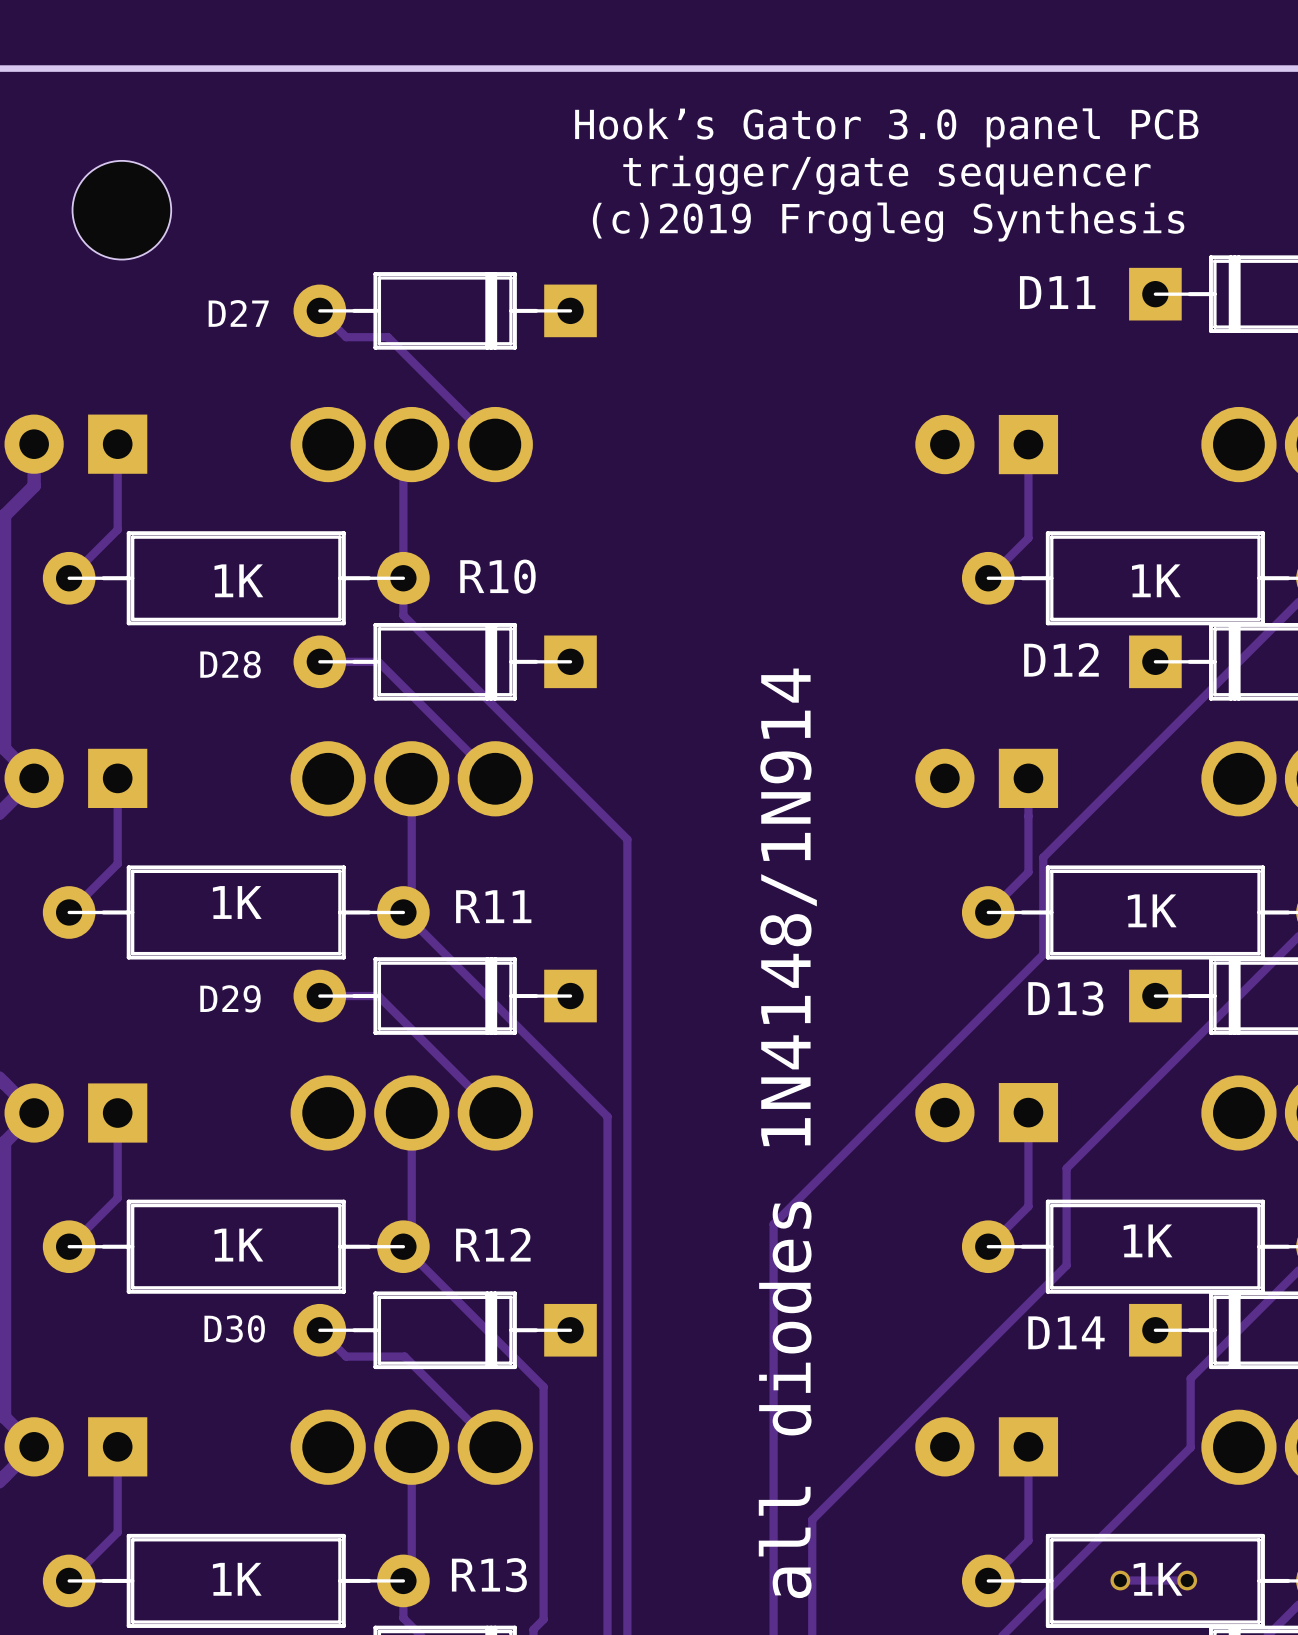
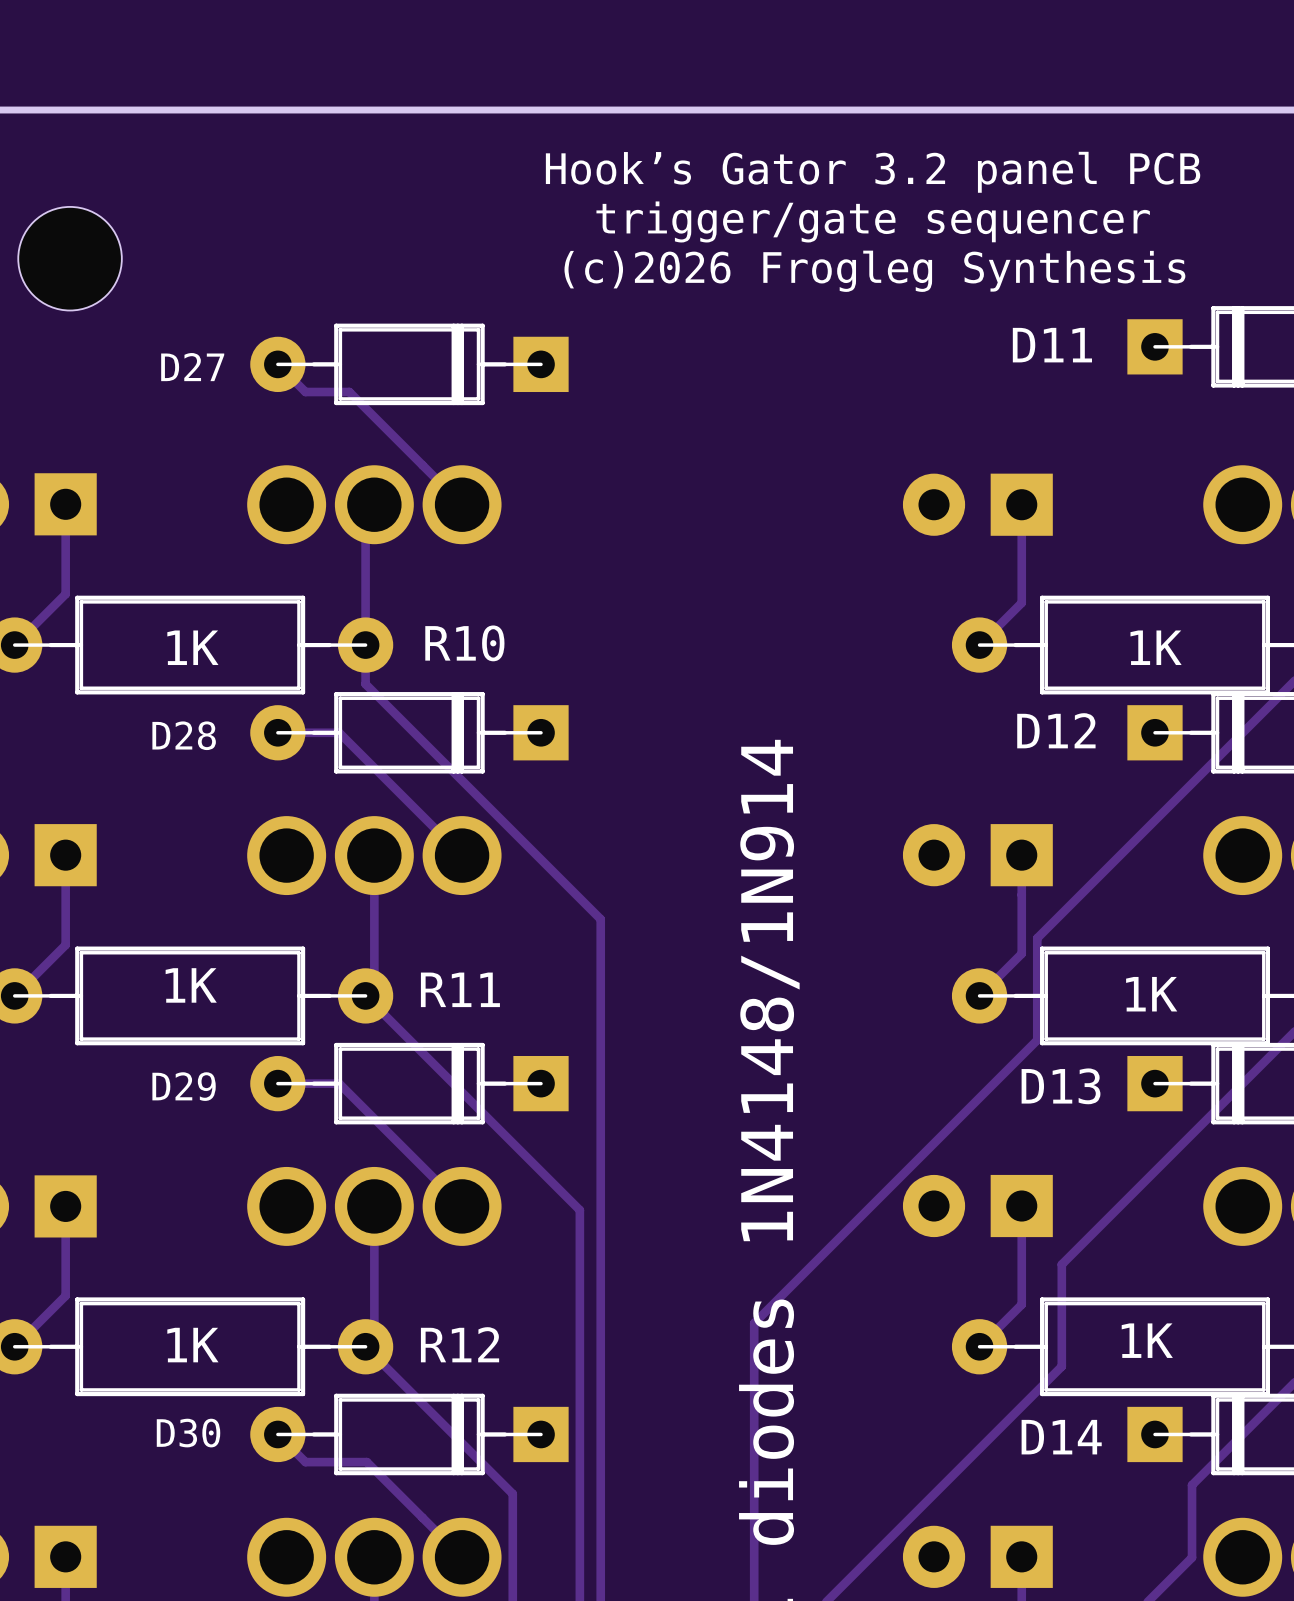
text: Hook’s Gator 3.0 panel PCB (886, 127) -> Hook’s Gator 3.2 panel PCB (873, 172)
text: (c)2019 Frogleg Synthesis (888, 222) -> (c)2026 Frogleg Synthesis (874, 271)

